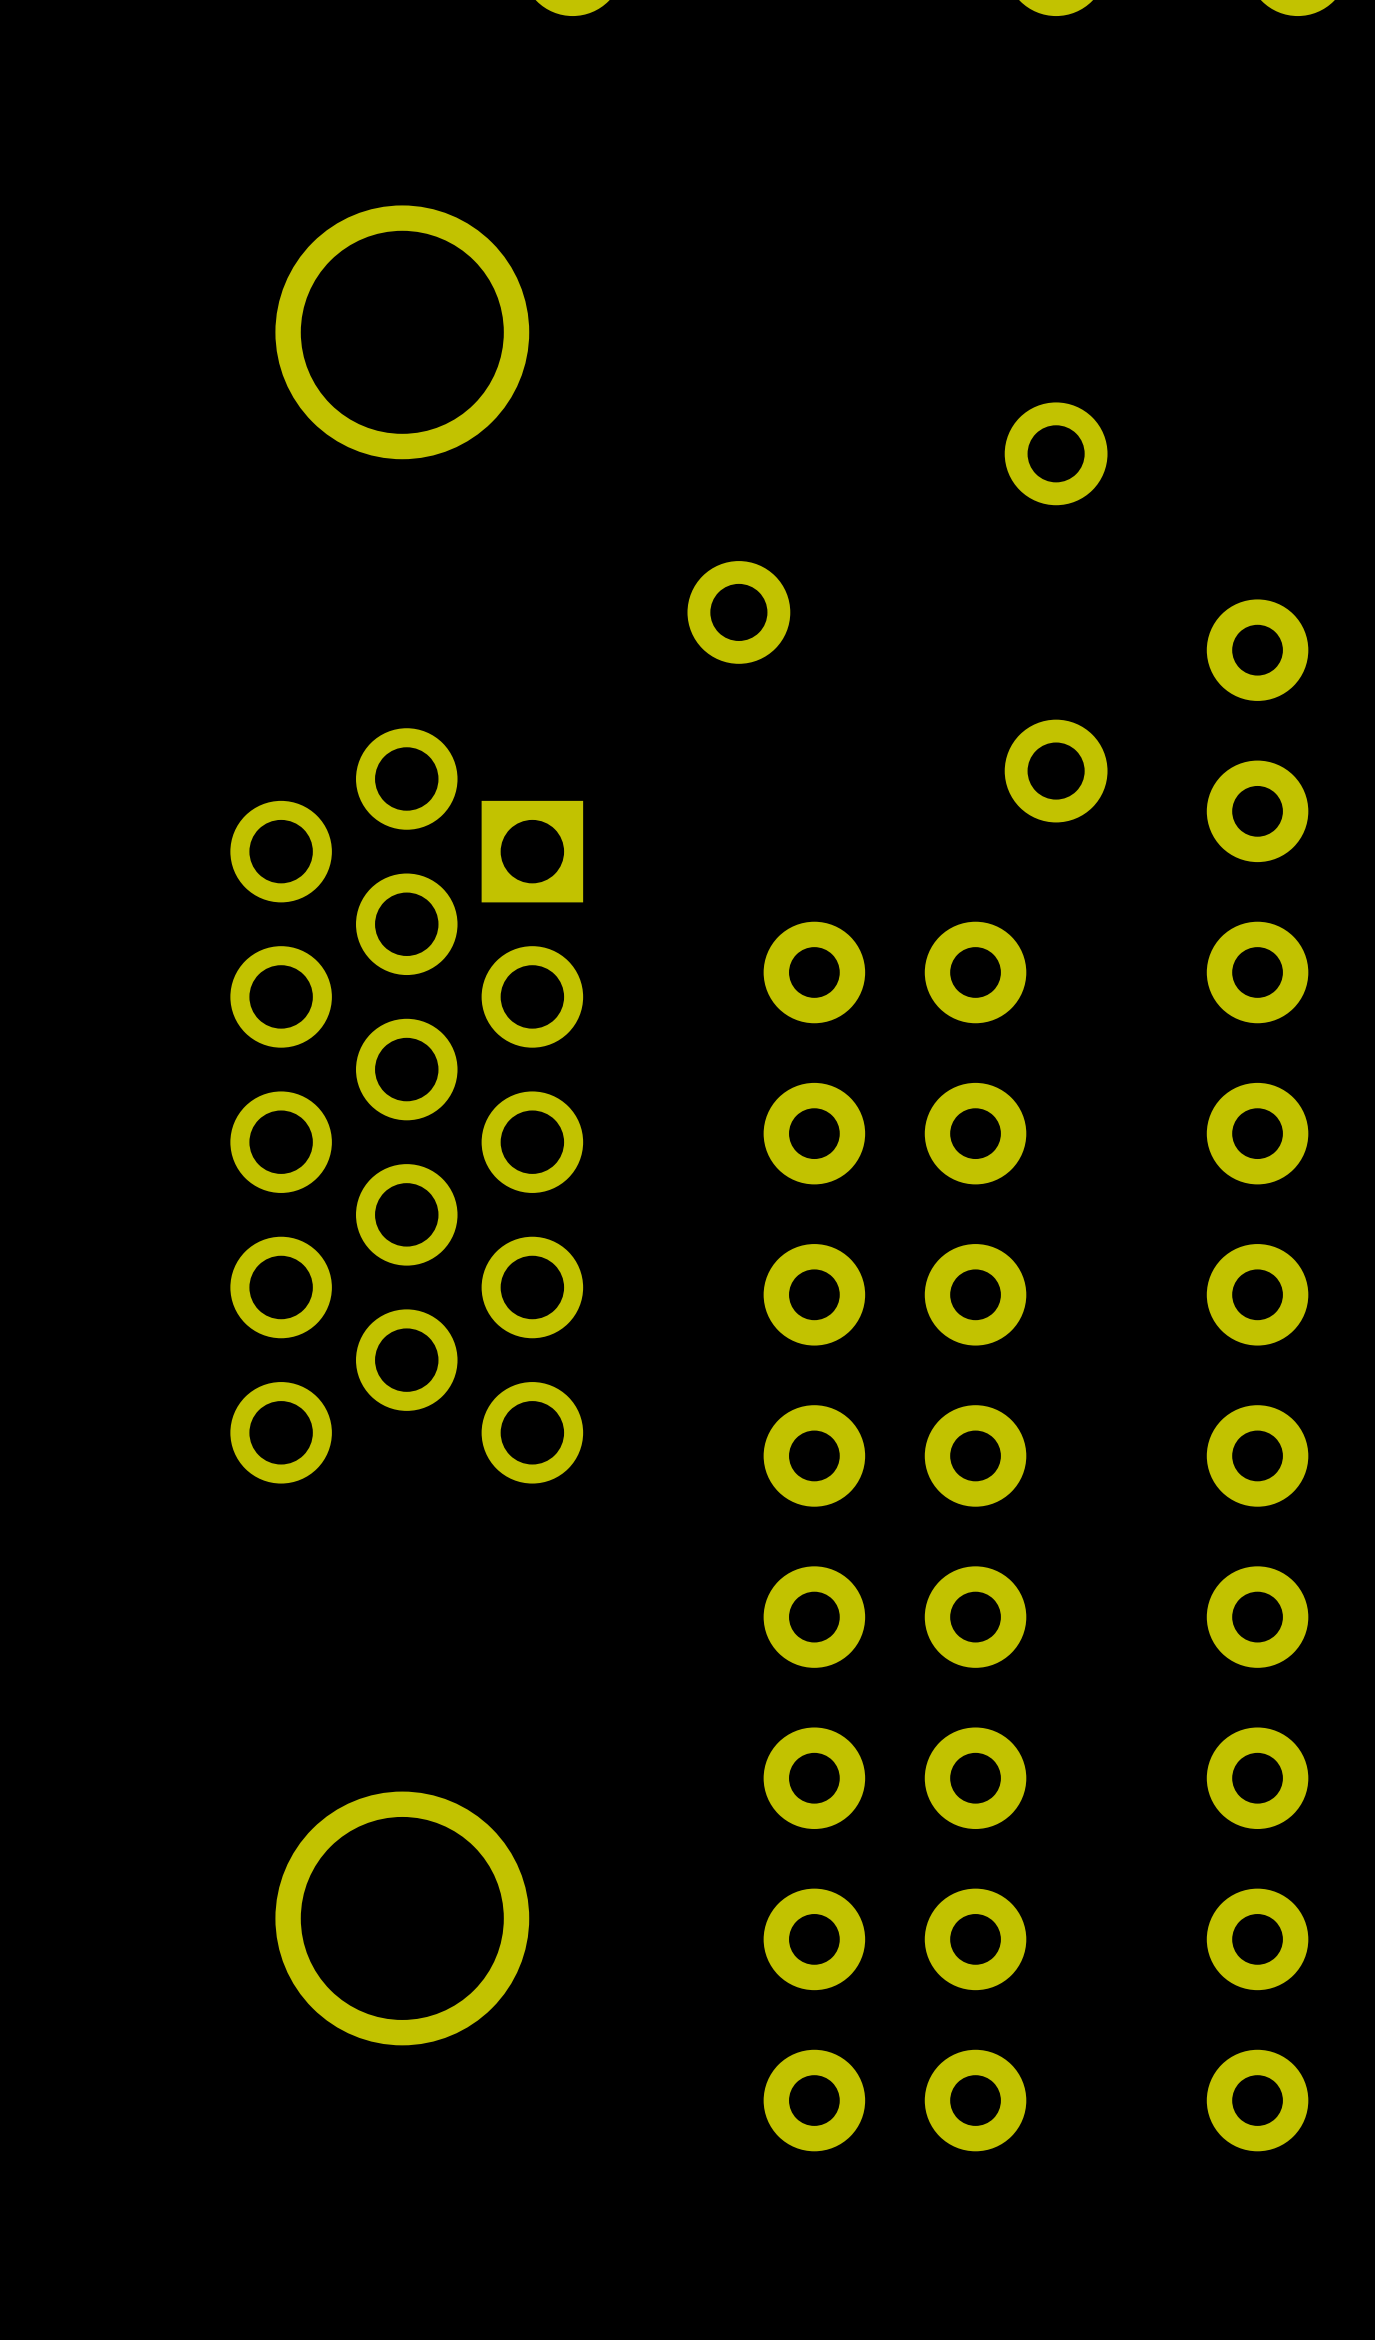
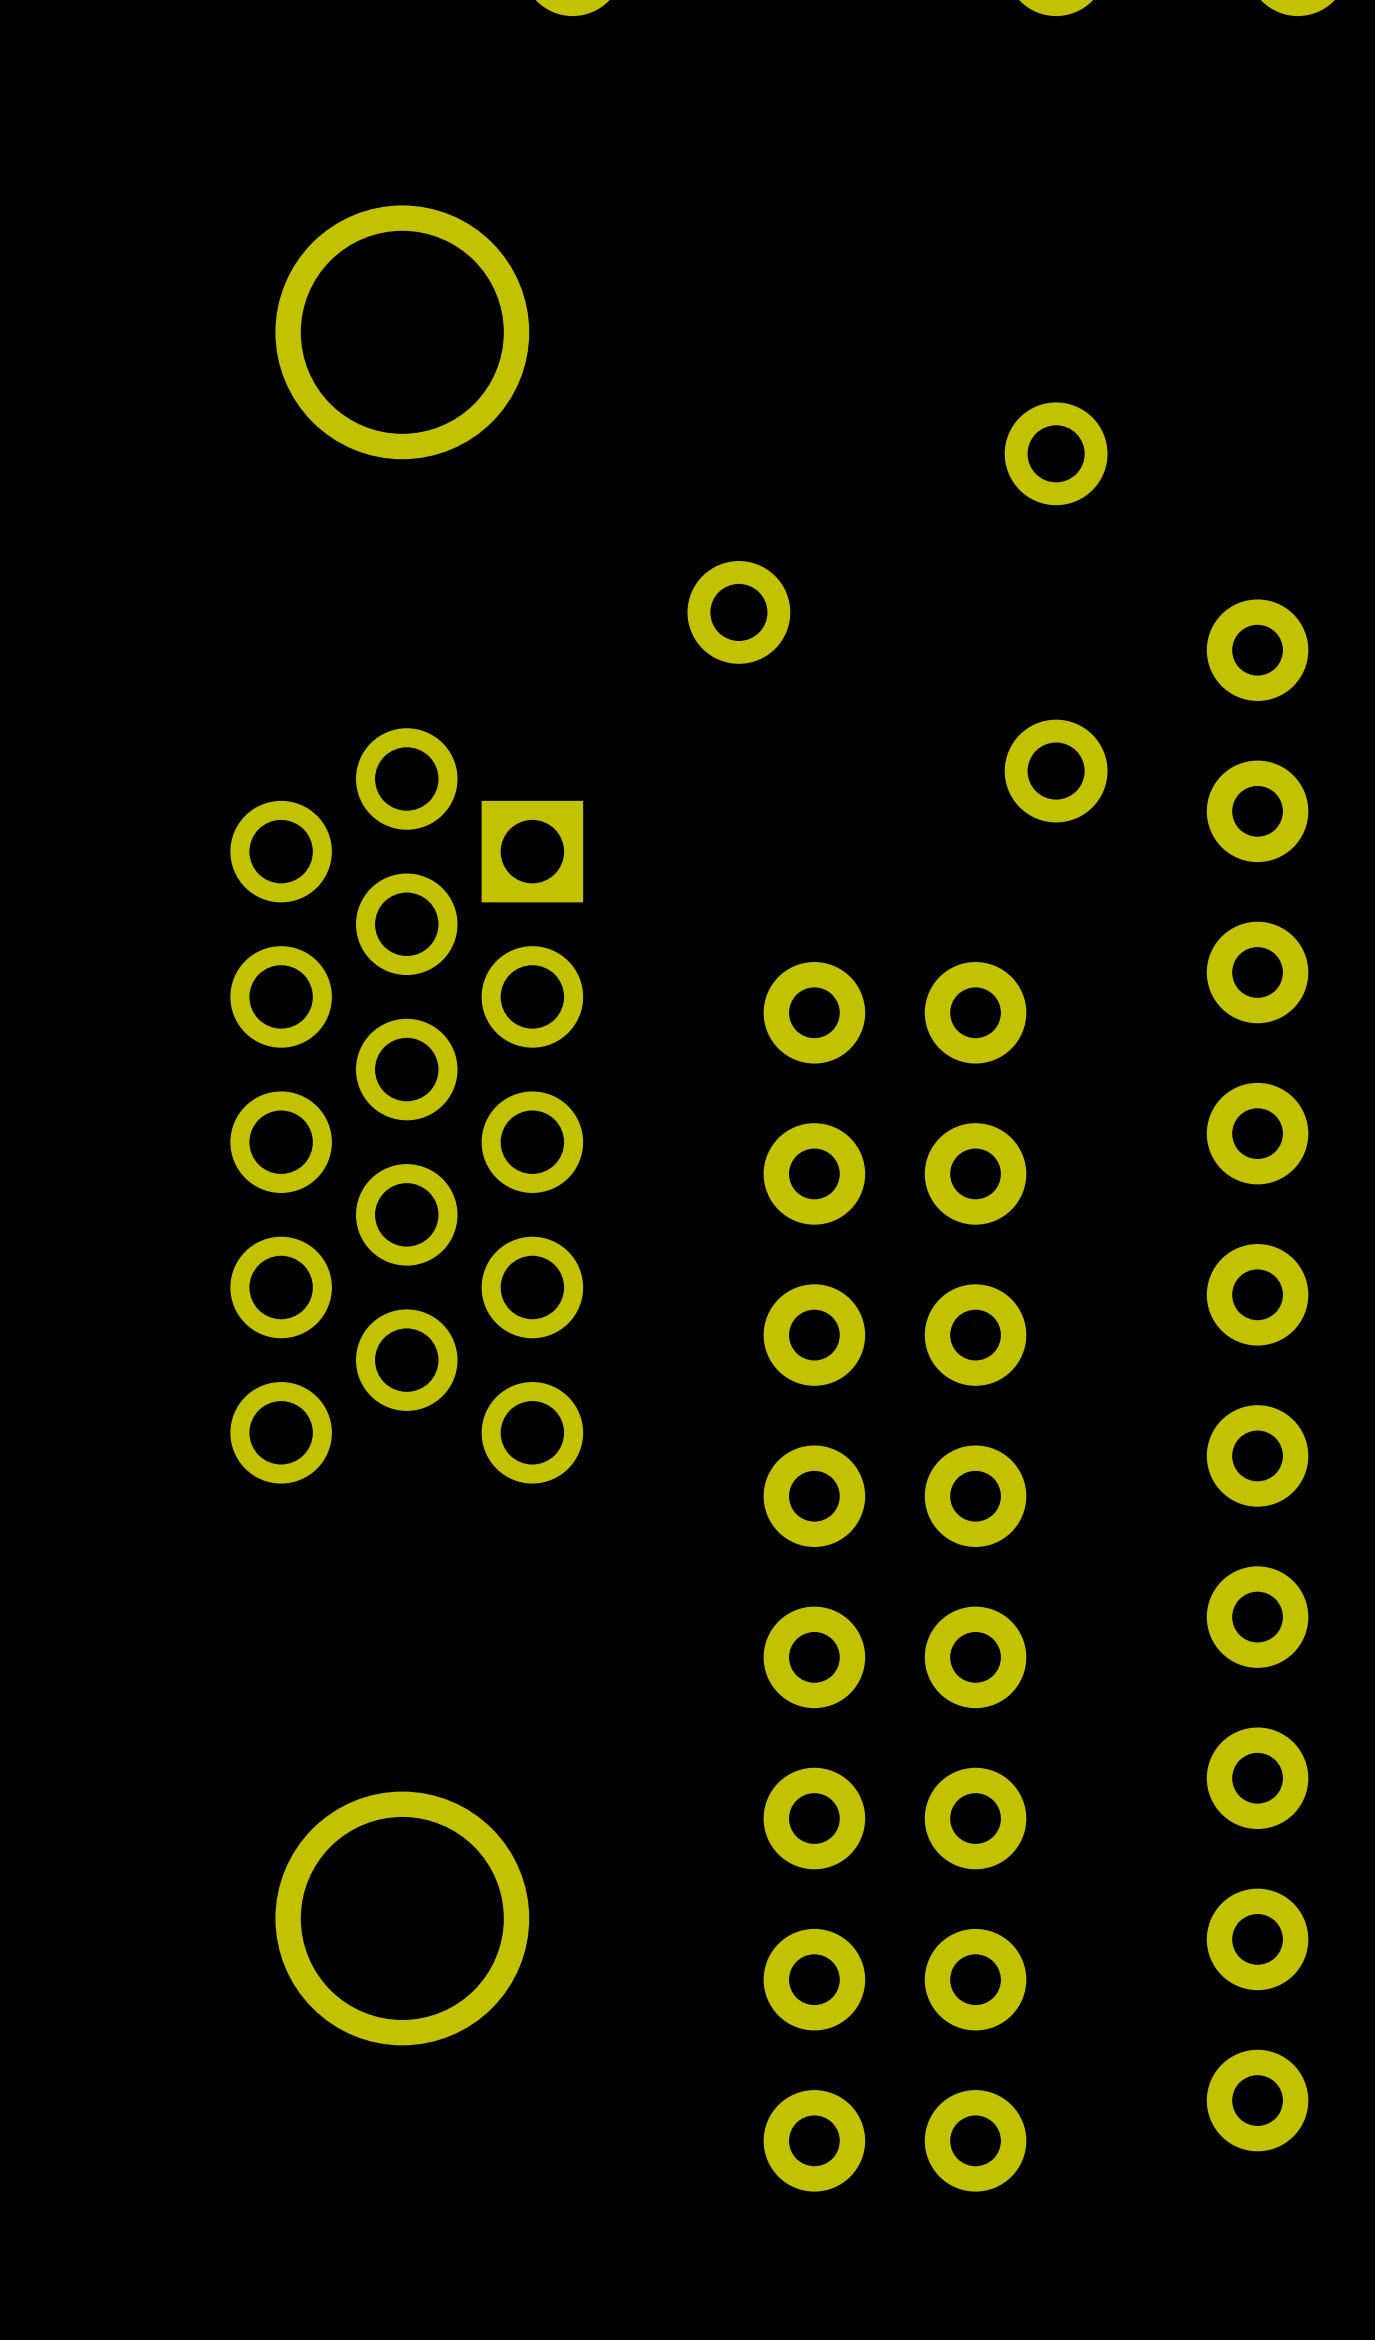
part position: (894, 972) -> (894, 1012)
part position: (894, 1133) -> (894, 1173)
part position: (894, 1294) -> (894, 1335)
part position: (894, 1455) -> (894, 1496)
part position: (894, 1617) -> (894, 1657)
part position: (894, 1778) -> (894, 1818)
part position: (894, 1939) -> (894, 1979)
part position: (894, 2100) -> (894, 2140)

